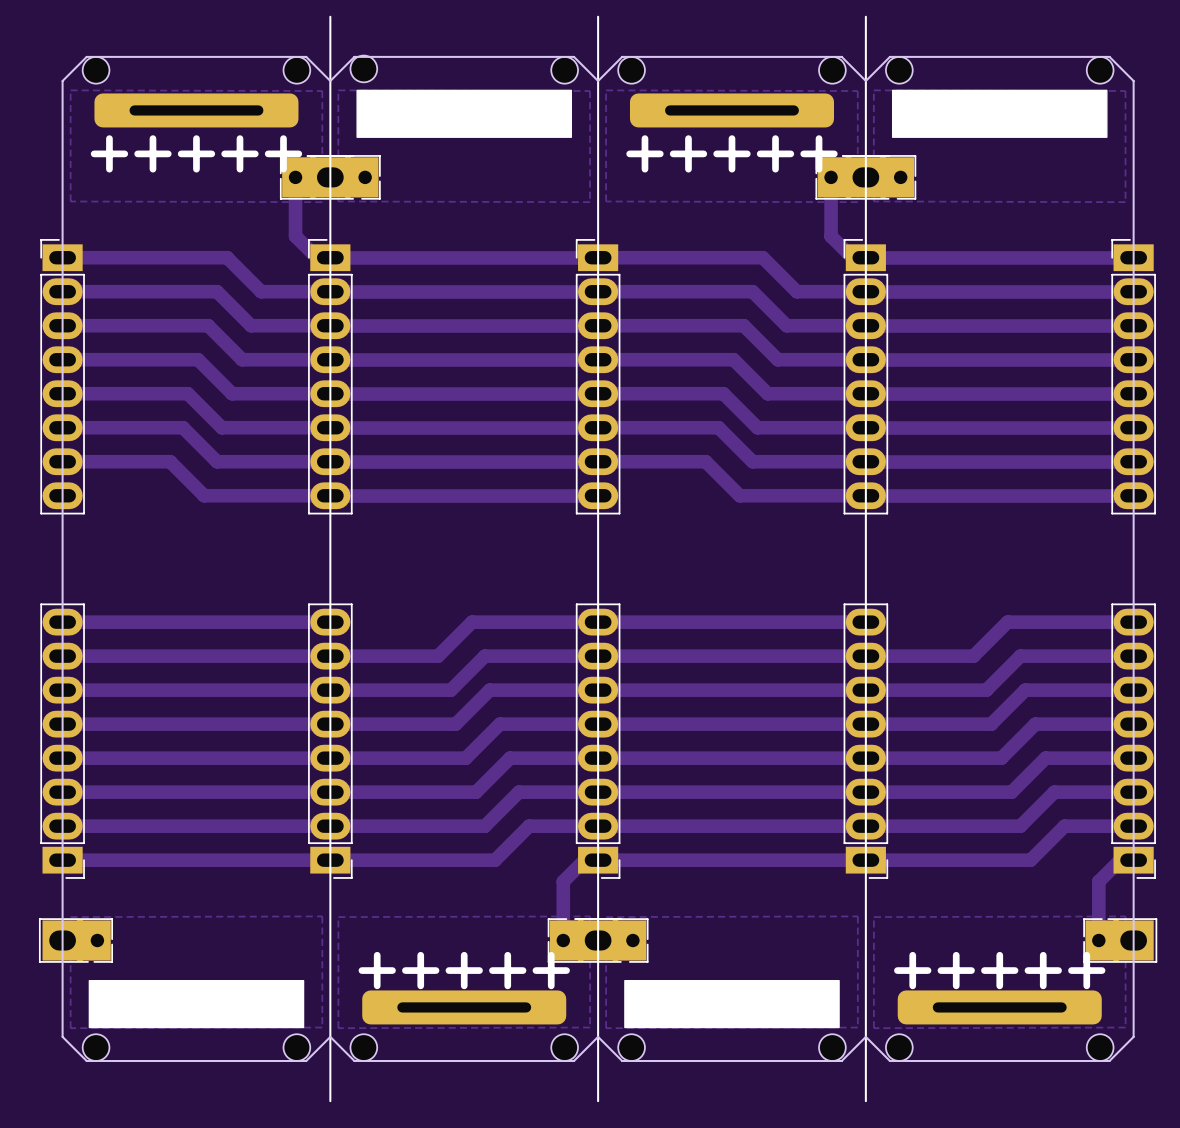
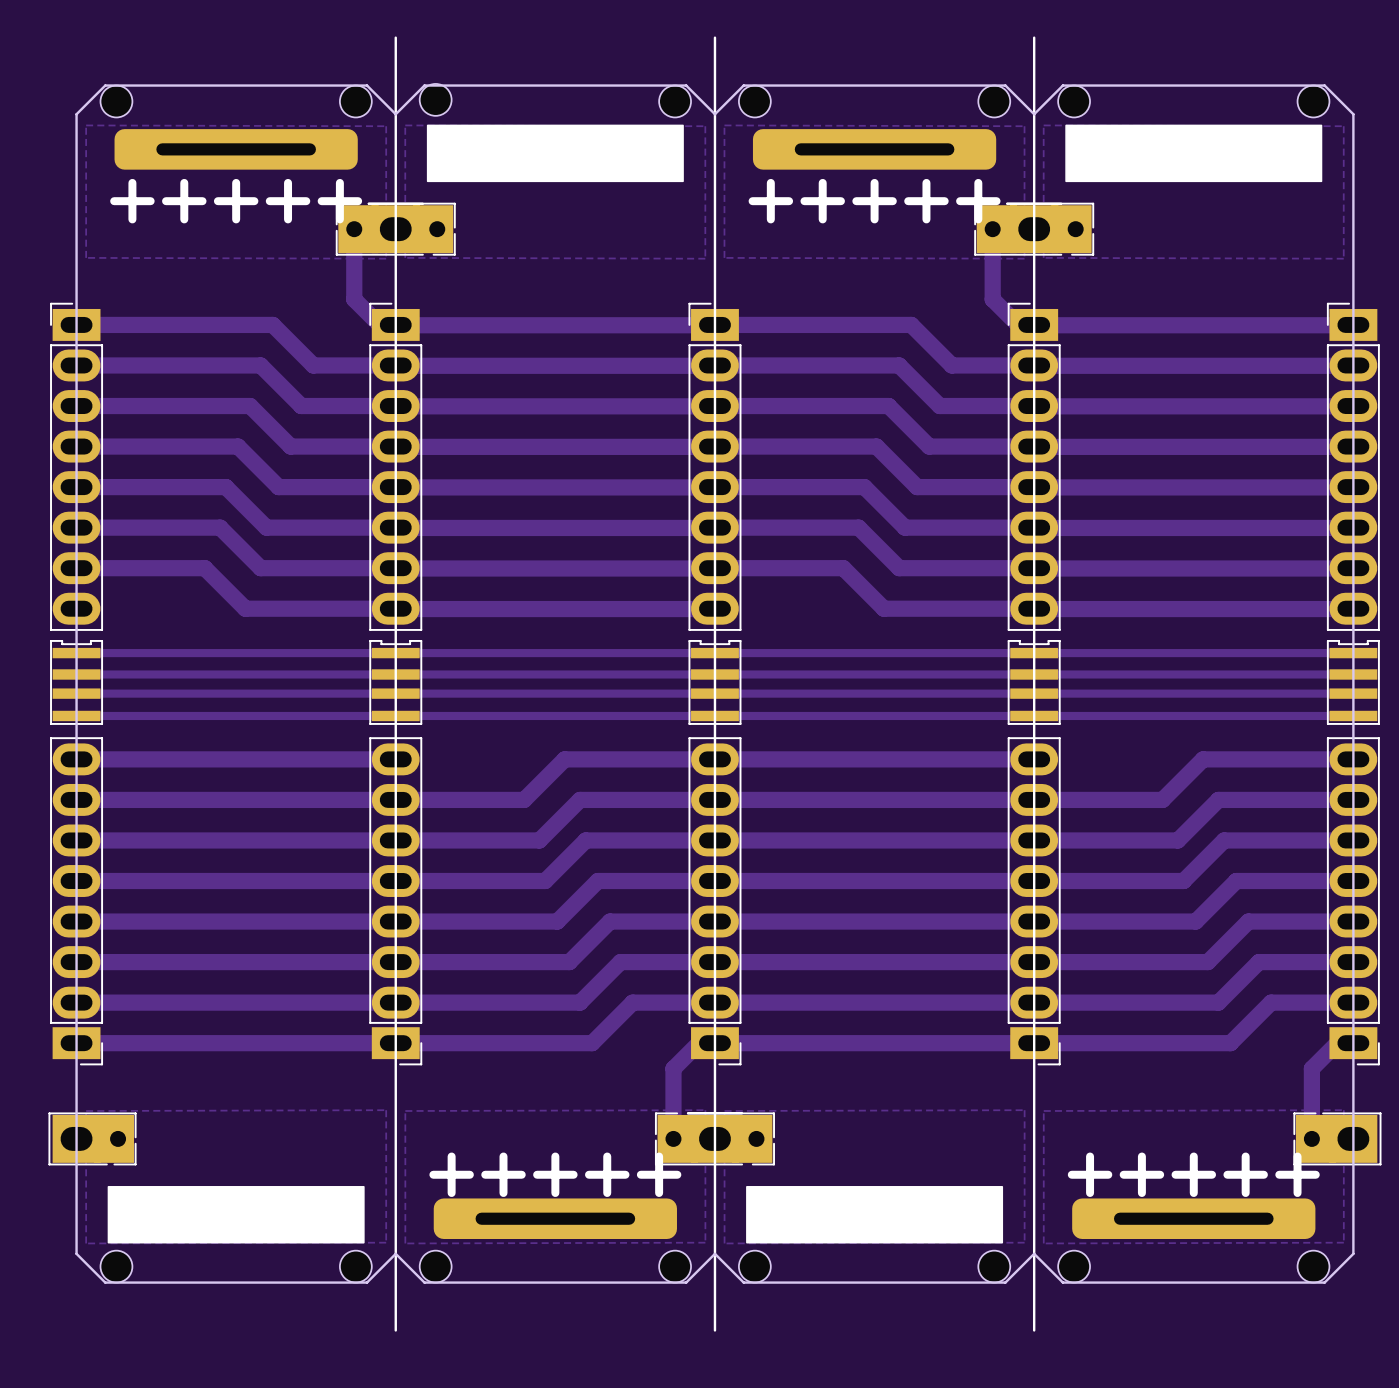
track: none -> (76, 653) (1353, 653)
track: none -> (76, 674) (1353, 674)
part: none -> (76, 682)
part: none -> (395, 682)
part: none -> (714, 682)
part: none -> (1034, 682)
part: none -> (1353, 682)
track: none -> (76, 693) (1353, 693)
track: none -> (76, 715) (1353, 715)

